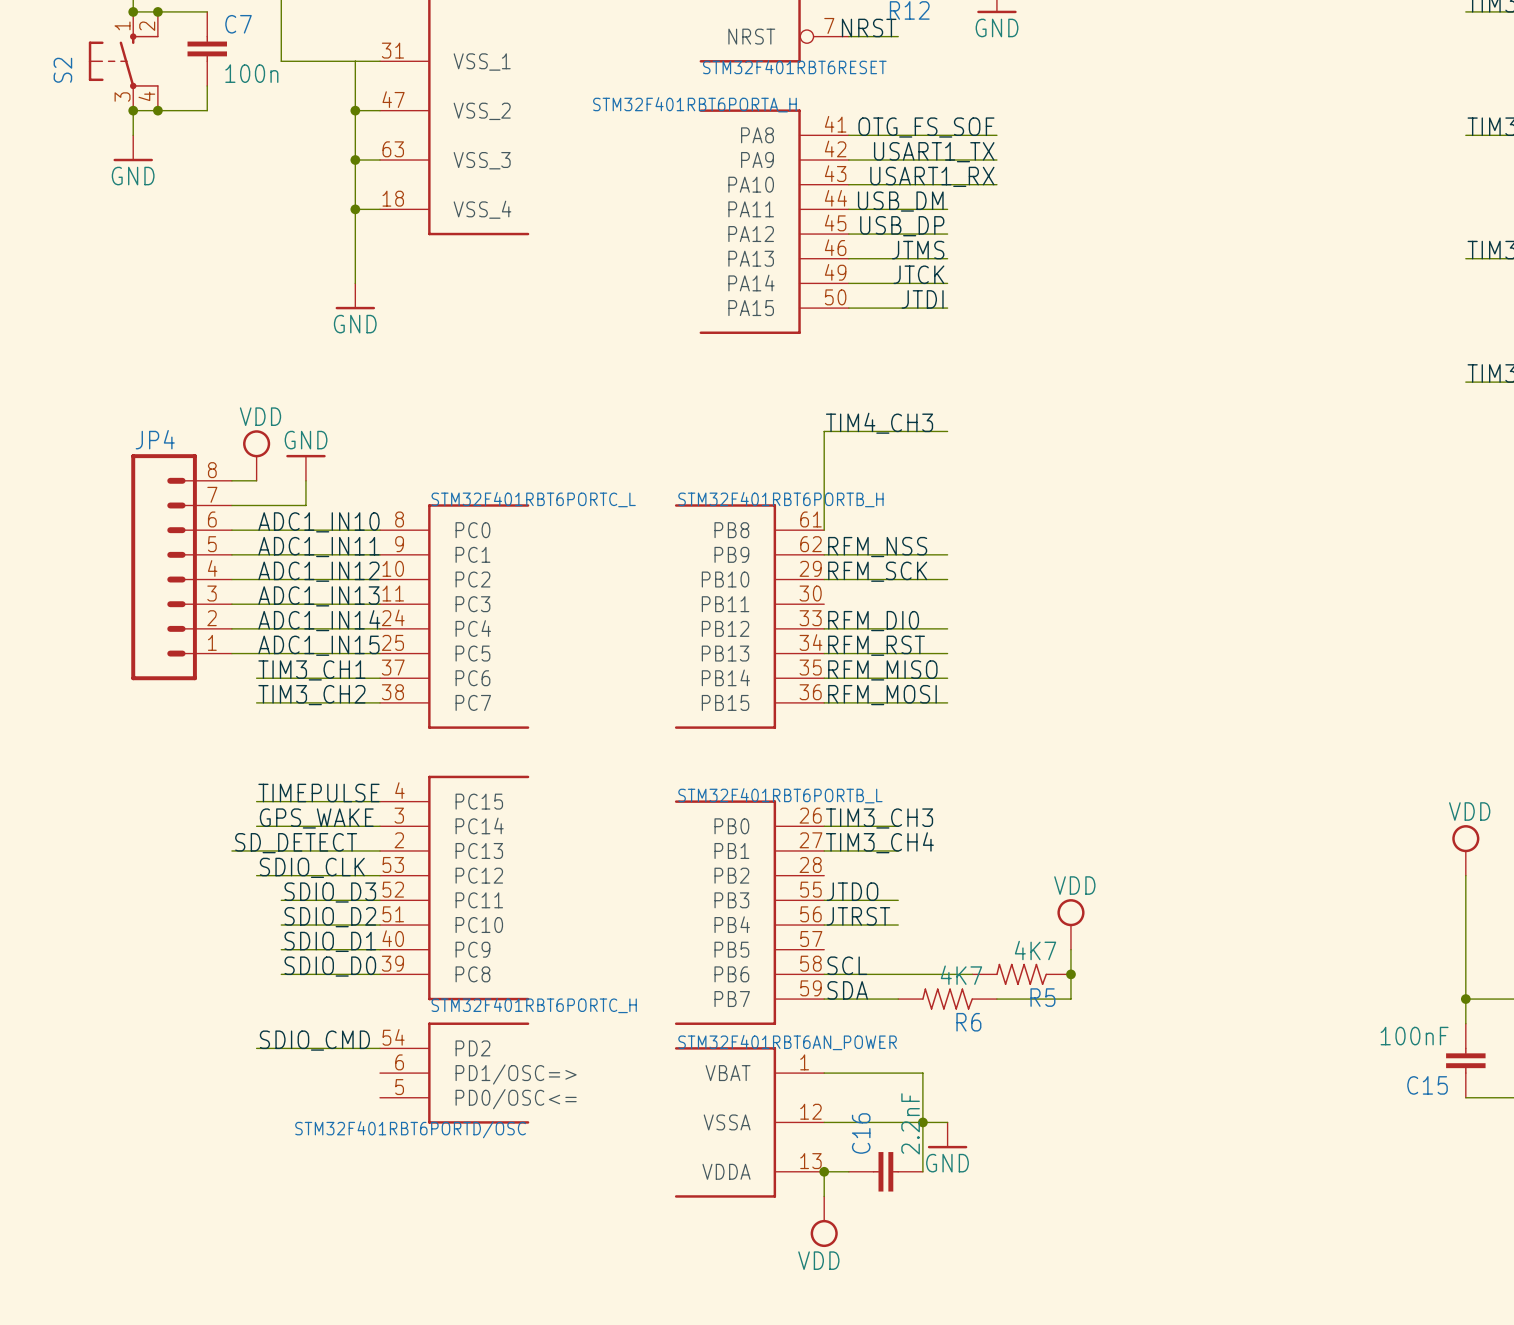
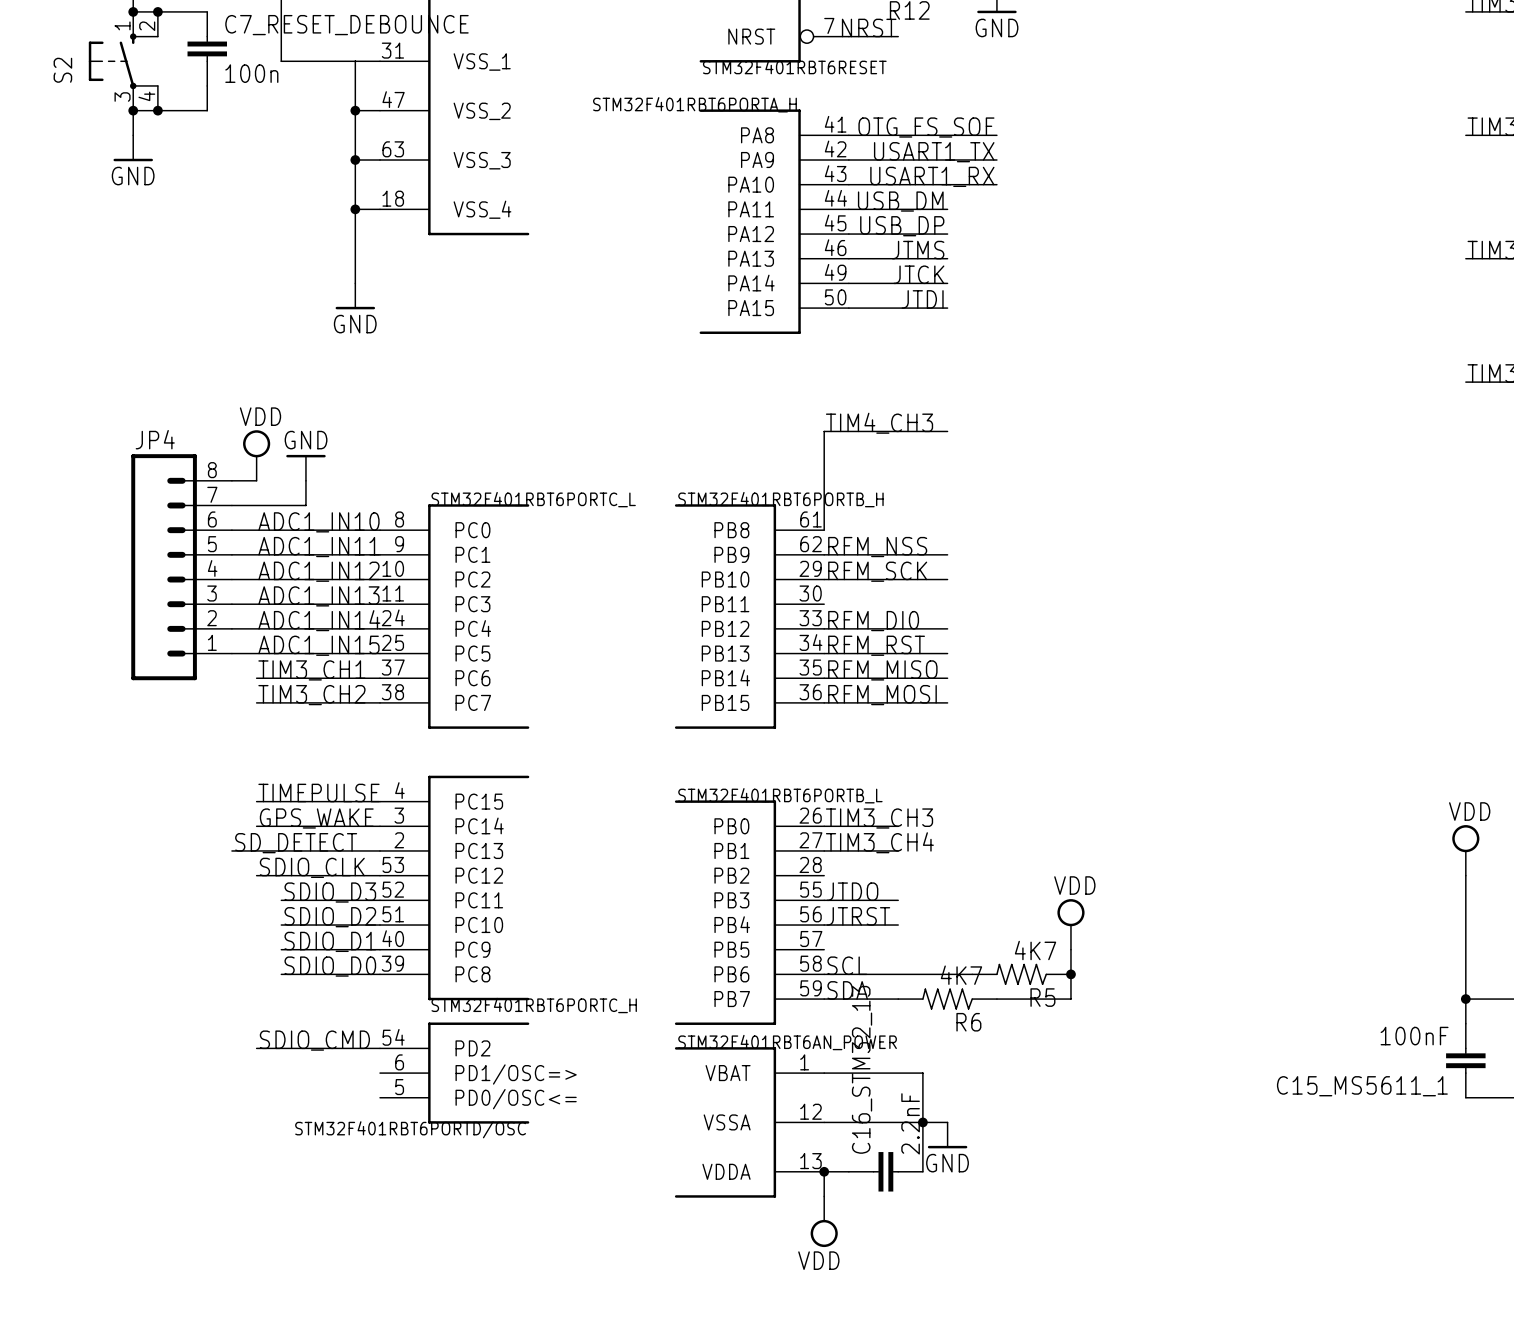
C7 name: C7 (238, 24) -> C7_RESET_DEBOUNCE (346, 25)
C15 name: C15 (1427, 1085) -> C15_MS5611_1 (1362, 1086)
C16 name: C16 (861, 1133) -> C16_STM32_13 (862, 1069)

